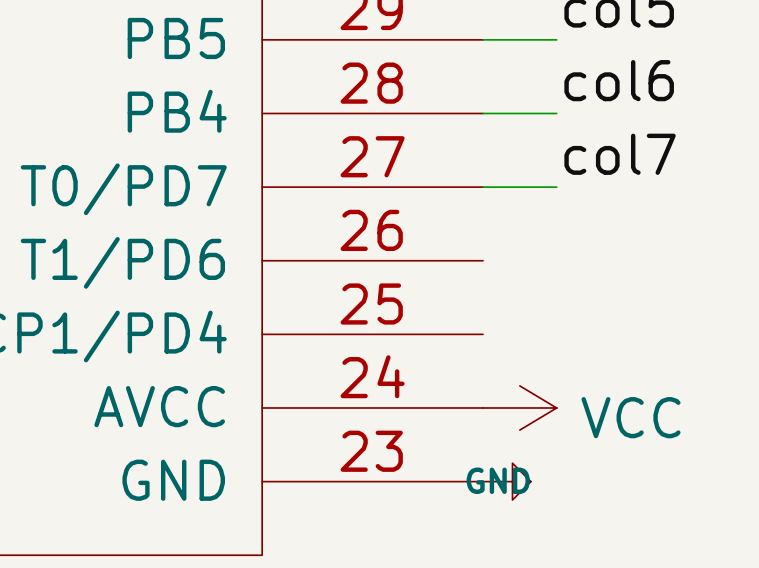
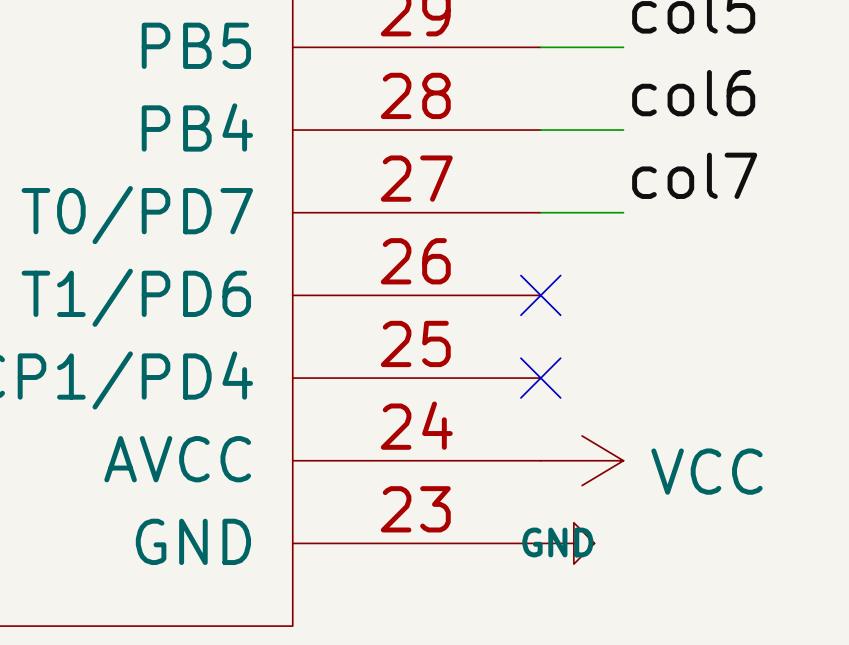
no-connect mark: none -> (540, 295)
no-connect mark: none -> (540, 378)

